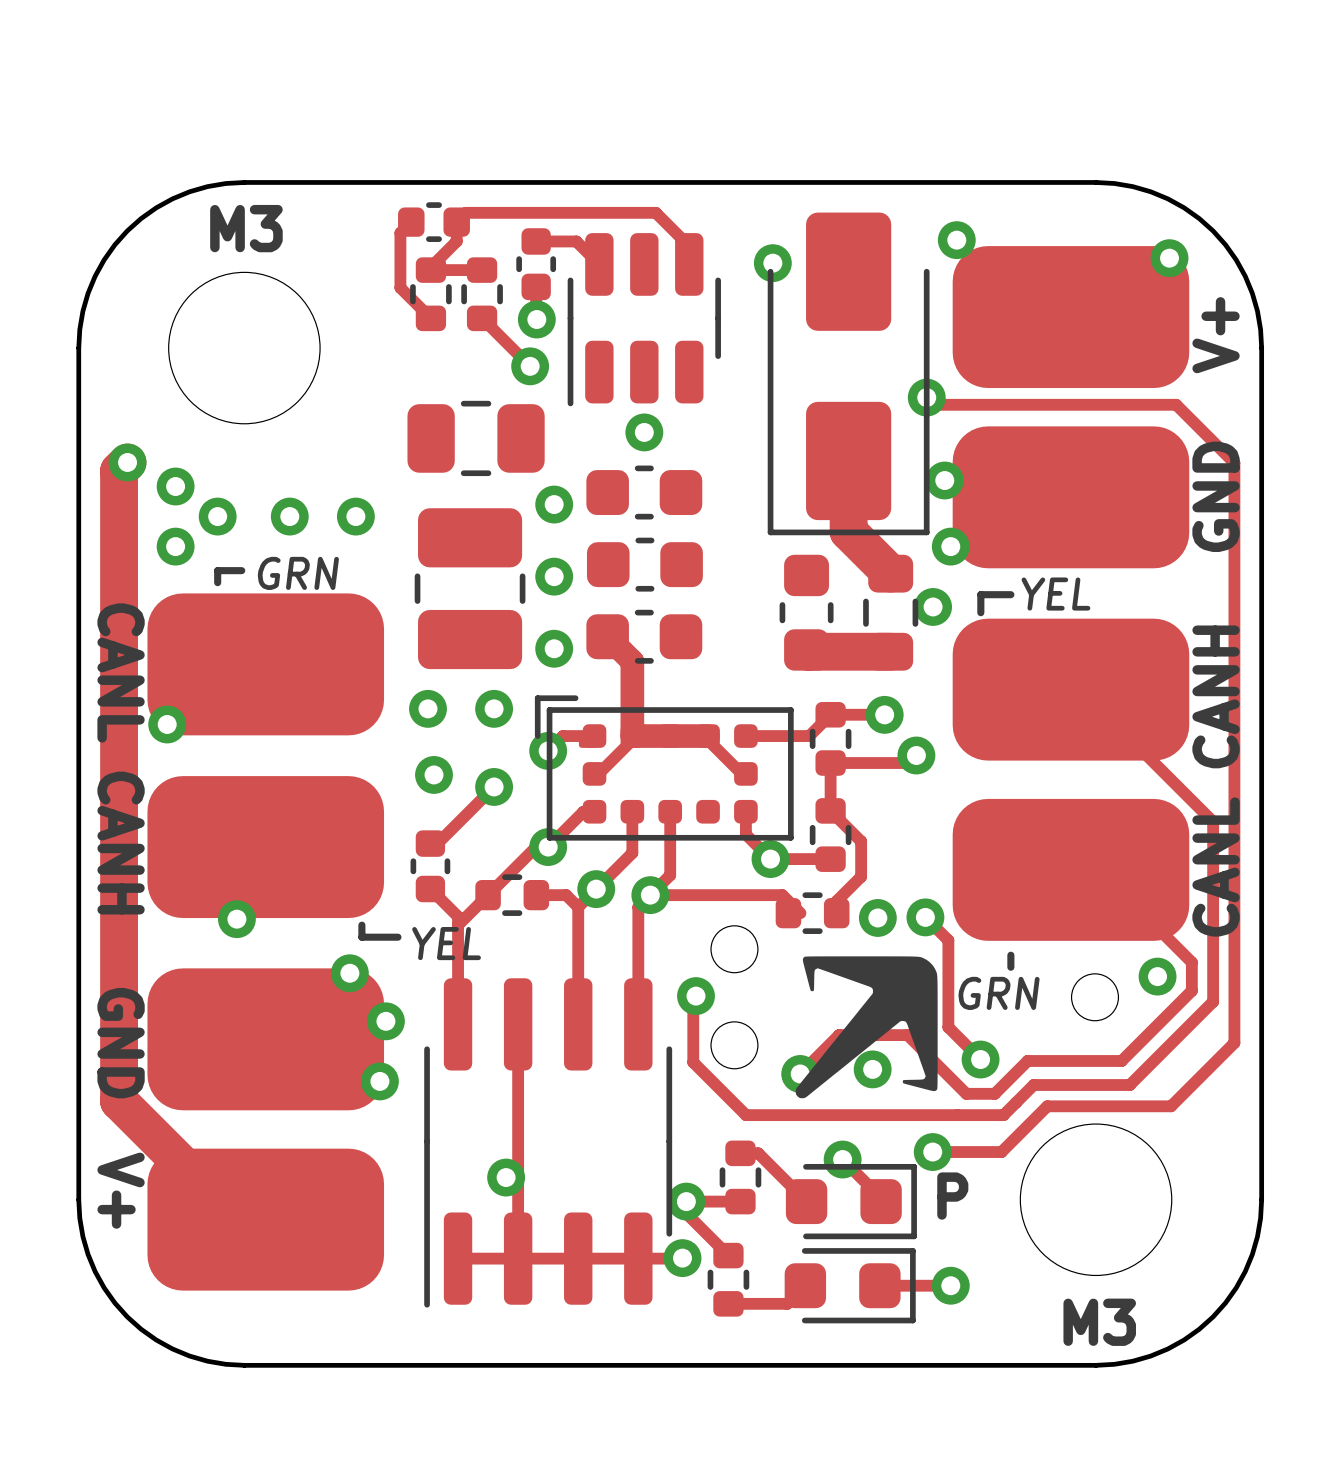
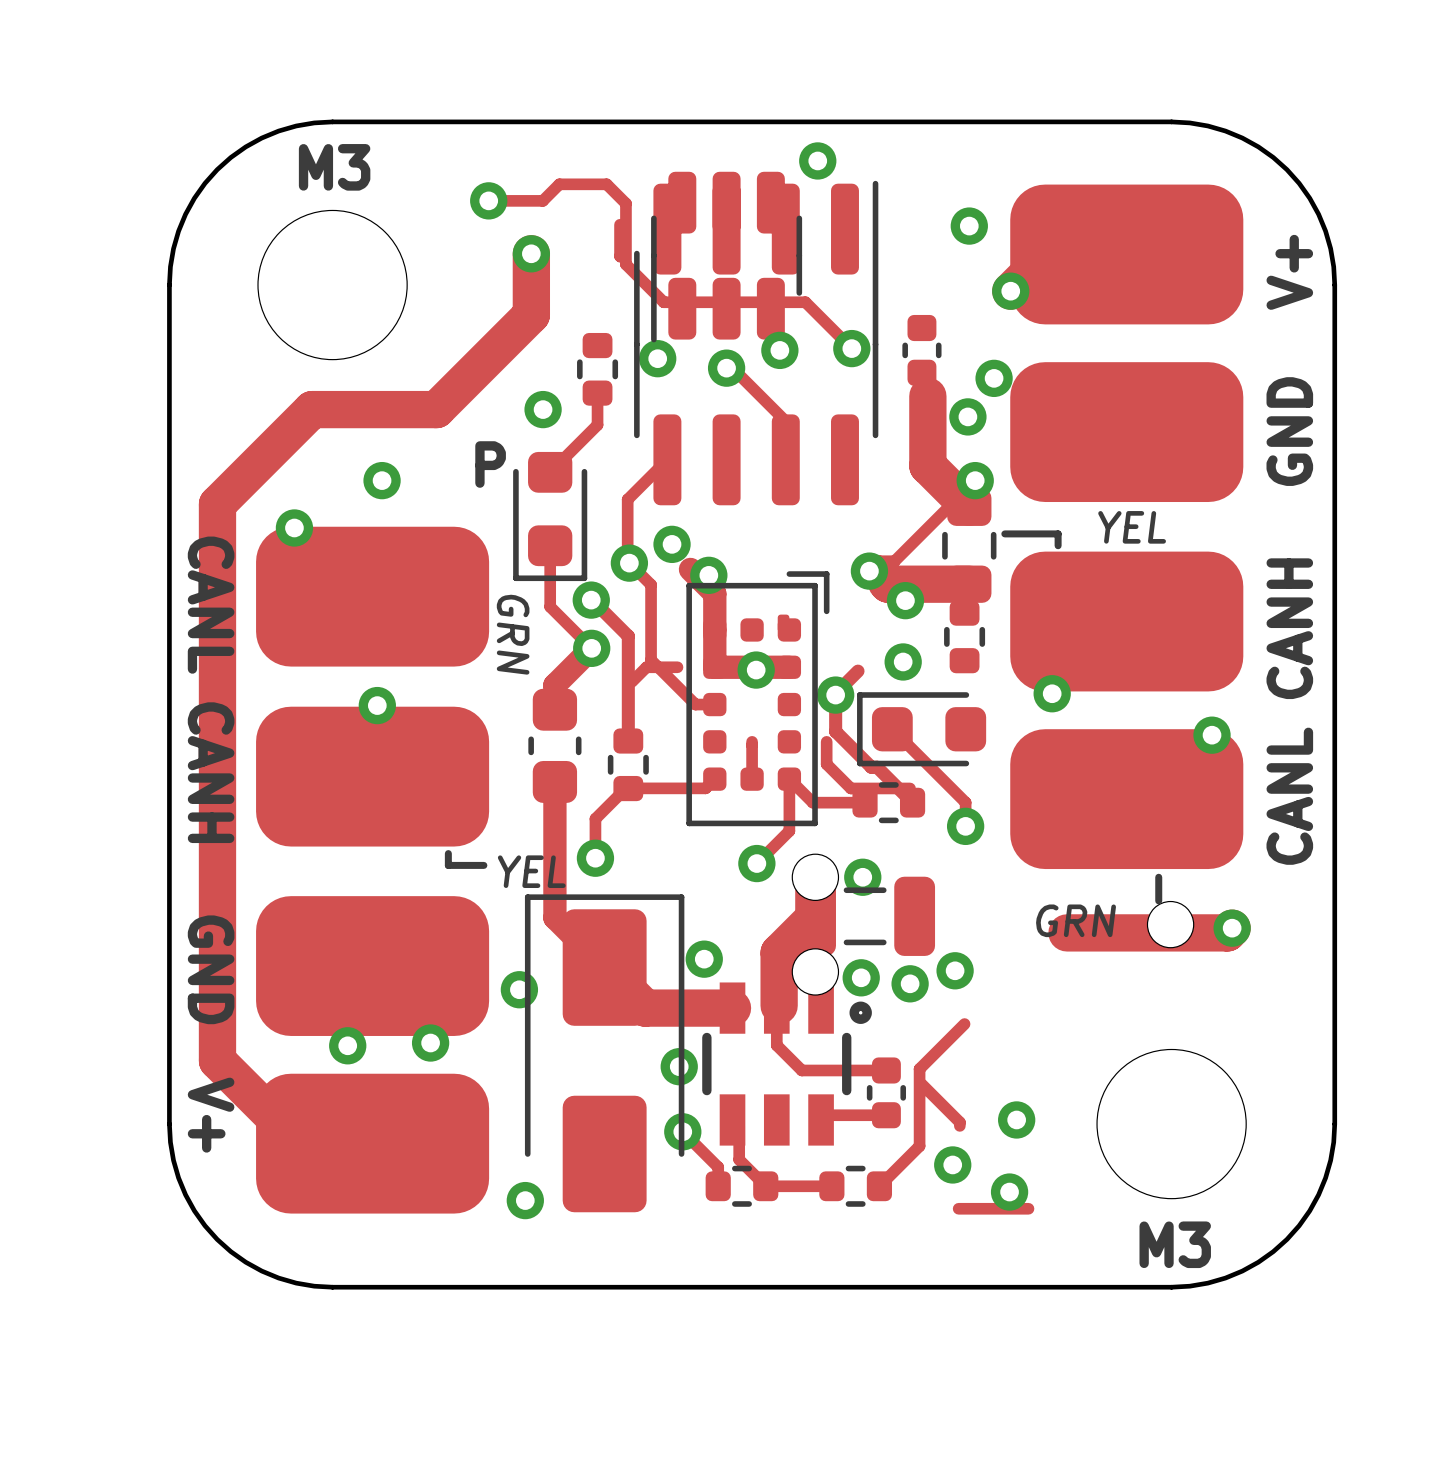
part footprint: [767, 212, 930, 536] -> [902, 314, 942, 386]
track: (411, 222) (400, 233) (400, 287) (430, 318) -> none
part: (434, 222) -> none
via: (956, 240) -> none
track: (536, 241) (576, 241) (599, 264) -> none
via: (1169, 258) -> none
track: none -> (488, 200) (542, 200) (559, 184) (606, 184) (625, 203) (625, 264) (663, 302) (805, 302) (851, 348)
via: none -> (488, 200)
via position: (772, 263) -> (817, 160)
part: (536, 264) -> none
track: (689, 264) (689, 246) (655, 212) (465, 212) (456, 222) (456, 241) (427, 270) (482, 270) -> none
via: none -> (969, 226)
part: (430, 294) -> none
part: (482, 294) -> none
via: none -> (531, 253)
part position: (1070, 317) -> (1126, 254)
track: (482, 318) (530, 366) -> none
via: (536, 319) -> none
via: none -> (1010, 291)
via: (530, 366) -> none
track: (926, 397) (933, 404) (1176, 404) (1234, 462) (1234, 1042) (1171, 1106) (1047, 1106) (1001, 1152) (932, 1152) -> none
via: (926, 397) -> none
part footprint: [407, 400, 545, 477] -> [577, 332, 619, 406]
part: none -> (756, 343)
via: none -> (851, 348)
via: none -> (779, 350)
via: none -> (657, 358)
track: none -> (726, 362) (785, 421) (785, 459)
via: none -> (994, 378)
track: none -> (597, 393) (597, 424) (550, 472)
track: (127, 462) (119, 470) (119, 1101) (237, 1219) -> (531, 253) (531, 314) (436, 409) (312, 409) (217, 504) (217, 1060) (300, 1143) (325, 1143)
via: (127, 462) -> none
via: none -> (543, 409)
via: (944, 480) -> none
via: none -> (967, 416)
via: (175, 486) -> none
part: (644, 492) -> none
part position: (1070, 497) -> (1126, 432)
via: (554, 504) -> none
part footprint: [414, 508, 526, 670] -> [513, 451, 588, 582]
via: (217, 516) -> none
via position: (289, 516) -> (382, 480)
via: (355, 516) -> none
track: none -> (667, 459) (627, 499) (627, 561) (651, 584) (651, 660) (695, 704) (714, 704)
via: (175, 546) -> none
track: none -> (975, 480) (894, 561) (879, 561) (869, 571)
via: none -> (975, 480)
via: (950, 546) -> none
part: (644, 564) -> none
line: (241, 570) (217, 570) (217, 582) -> none
text rotation: 0° (298, 573) -> 90° clockwise (513, 634)
text position: GRN (298, 573) -> GRN (513, 634)
via: (554, 576) -> none
via: none -> (294, 527)
line: (1010, 594) (980, 594) (980, 600) -> (1004, 533) (1058, 533)
via: (933, 606) -> none
via: none -> (672, 544)
track: none -> (550, 545) (550, 606) (591, 648) (554, 685) (554, 709)
part: (806, 612) -> none
part: (644, 636) -> none
via: none -> (869, 571)
via: none -> (708, 575)
via position: (554, 648) -> (629, 563)
part position: (265, 664) -> (372, 596)
track: none -> (591, 600) (628, 636) (628, 741)
via: none -> (591, 600)
via: none -> (905, 600)
track: (1070, 689) (1080, 689) (1213, 821) (1213, 1001) (1129, 1085) (1033, 1085) (1003, 1115) (746, 1115) (693, 1062) (693, 998) (696, 996) -> none
part position: (1070, 689) -> (1126, 621)
via: (427, 708) -> none
via position: (494, 708) -> (591, 648)
track: (884, 714) (830, 714) (809, 736) (745, 736) -> none
via: (884, 714) -> none
via: (167, 724) -> none
via: none -> (903, 661)
track: (632, 736) (632, 740) (598, 773) (594, 773) -> none
via: none -> (756, 670)
part position: (830, 738) -> (964, 636)
track: none -> (858, 671) (835, 693) (835, 731) (871, 767) (877, 767) (912, 802)
track: (708, 740) (741, 773) (745, 773) -> none
via: (548, 750) -> none
track: (916, 755) (908, 763) (830, 763) (830, 810) (861, 841) (861, 876) (836, 901) (836, 913) -> none
via: (916, 755) -> none
via: none -> (1052, 693)
via: none -> (835, 695)
part rotation: 0° (664, 767) -> 90° clockwise (757, 698)
via: none -> (377, 705)
via: (434, 774) -> none
track: (494, 786) (437, 843) (430, 843) -> none
via: (494, 786) -> none
track: none -> (892, 729) (965, 802) (965, 826)
part: none -> (921, 729)
via: none -> (1212, 735)
track: (594, 811) (583, 811) (548, 847) (536, 847) (458, 925) -> none
track: (632, 811) (632, 853) (578, 907) -> none
part: none -> (554, 745)
part: (830, 835) -> none
part position: (265, 847) -> (372, 776)
via: (548, 847) -> none
track: none -> (714, 779) (705, 788) (625, 788) (595, 818) (595, 858)
track: (670, 849) (670, 875) (638, 907) (638, 1024) -> none
track: none -> (554, 781) (554, 917) (645, 1008) (732, 1008)
via: (770, 859) -> none
part: (430, 866) -> none
track: (1070, 869) (1099, 869) (1191, 962) (1191, 990) (1121, 1060) (1027, 1060) (994, 1093) (966, 1093) (907, 1035) (839, 1035) (800, 1073) -> none
part position: (1070, 869) -> (1126, 799)
track: none -> (865, 802) (812, 802) (789, 779) (789, 831) (756, 863)
part: none -> (888, 802)
track: (430, 889) (458, 916) (458, 1024) -> none
via: (596, 889) -> none
part rotation: 0° (512, 895) -> 90° clockwise (628, 764)
part position: (512, 895) -> (628, 764)
track: (536, 895) (566, 895) (578, 907) -> none
track: (650, 895) (782, 895) (800, 913) -> none
via: (650, 895) -> none
track: (578, 907) (578, 1024) -> none
part: (812, 913) -> none
via position: (877, 917) -> (965, 826)
track: (925, 917) (948, 940) (948, 1027) (980, 1059) -> none
via: (925, 917) -> none
via: (236, 919) -> none
via: none -> (595, 858)
via: none -> (756, 863)
via: none -> (862, 877)
line: none -> (1158, 877) (1158, 900)
line: (1010, 955) (1010, 967) -> none
drawing: [795, 956, 938, 1099] -> none
via: (349, 973) -> none
via position: (1157, 976) -> (1232, 928)
part footprint: [424, 978, 673, 1308] -> [524, 894, 685, 1213]
track: none -> (815, 916) (779, 952) (779, 1005)
part: none -> (865, 916)
via: (696, 996) -> none
track: none -> (1232, 928) (1227, 932) (1067, 932)
via: (385, 1021) -> none
track: (518, 1024) (518, 1258) -> none
via: none -> (704, 959)
part position: (265, 1039) -> (372, 966)
via: none -> (861, 977)
via: none -> (910, 983)
via: (980, 1059) -> none
via: none -> (519, 989)
via position: (872, 1069) -> (955, 970)
via: (800, 1073) -> none
via: (379, 1081) -> none
track: none -> (776, 1008) (776, 1045) (801, 1070) (886, 1070)
track: none -> (964, 1024) (919, 1069) (919, 1146) (879, 1186)
via: none -> (430, 1043)
via: none -> (347, 1045)
part: none -> (787, 1064)
via: none -> (679, 1066)
via position: (932, 1152) -> (1016, 1119)
track: (740, 1153) (758, 1153) (806, 1201) -> none
via: (842, 1159) -> none
part: none -> (886, 1092)
via: (506, 1177) -> none
part: (740, 1177) -> none
track: none -> (886, 1115) (825, 1115) (821, 1119)
track: none -> (732, 1119) (739, 1126) (739, 1159) (765, 1186) (831, 1186)
text position: P (952, 1196) -> P (490, 464)
via: (686, 1201) -> none
track: (740, 1201) (686, 1201) (686, 1213) (728, 1255) -> none
part: (851, 1201) -> none
track: none -> (682, 1131) (718, 1167) (718, 1186)
via: none -> (682, 1131)
part position: (265, 1219) -> (372, 1143)
via: none -> (952, 1164)
track: (458, 1258) (682, 1258) -> none
via: (682, 1258) -> none
part: none -> (741, 1186)
part: none -> (855, 1186)
via: none -> (525, 1200)
part: (728, 1279) -> none
track: (805, 1285) (787, 1303) (728, 1303) -> none
part: (850, 1285) -> none
via position: (950, 1285) -> (1009, 1192)

